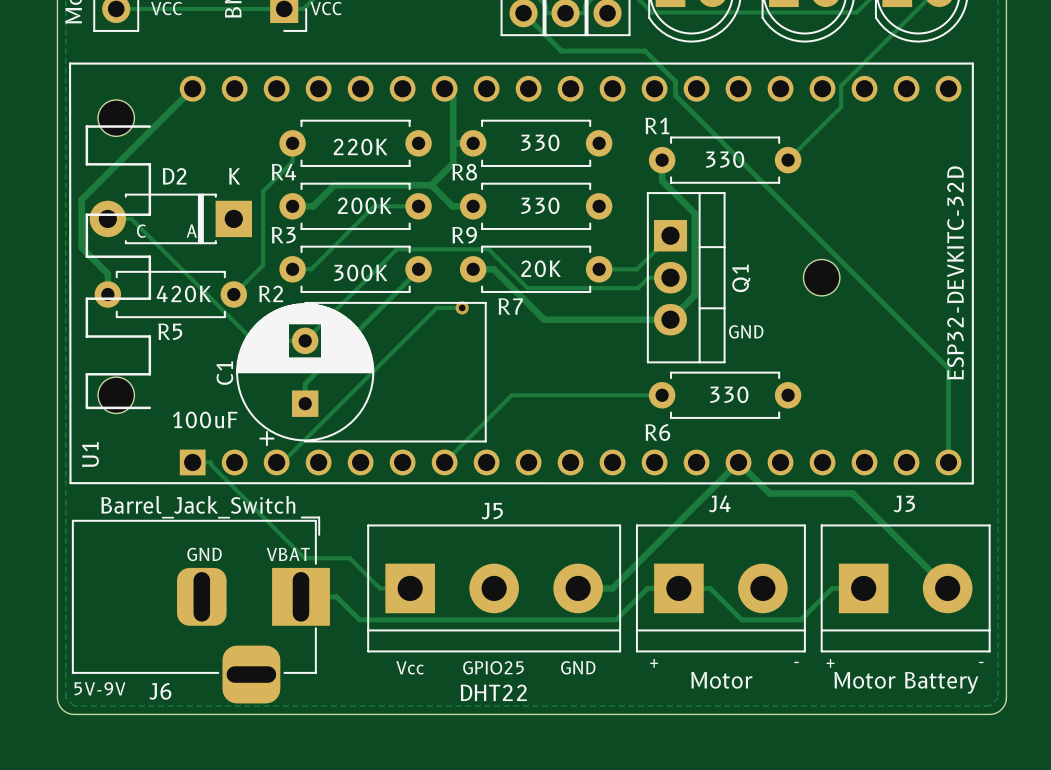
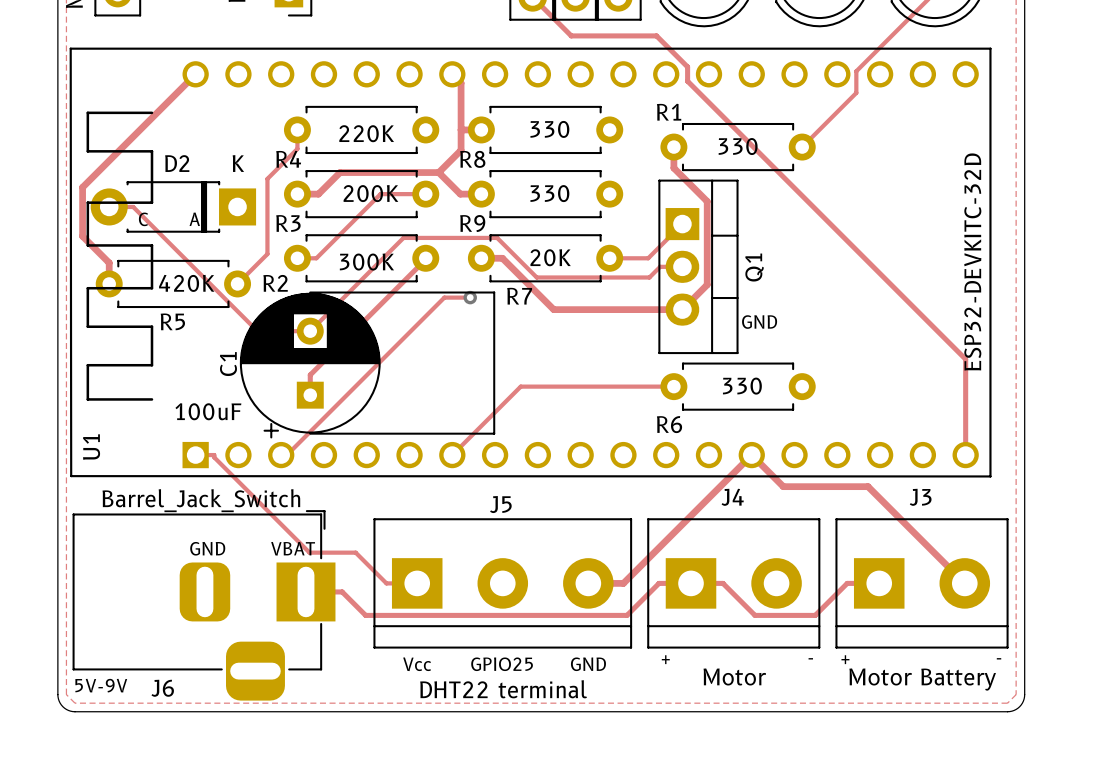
part: (116, 118) -> none
part: (821, 277) -> none
part: (116, 395) -> none
J5 value: DHT22 (493, 692) -> DHT22 terminal (503, 689)

